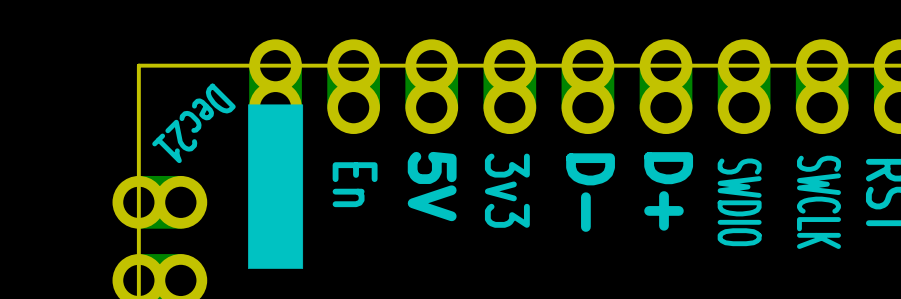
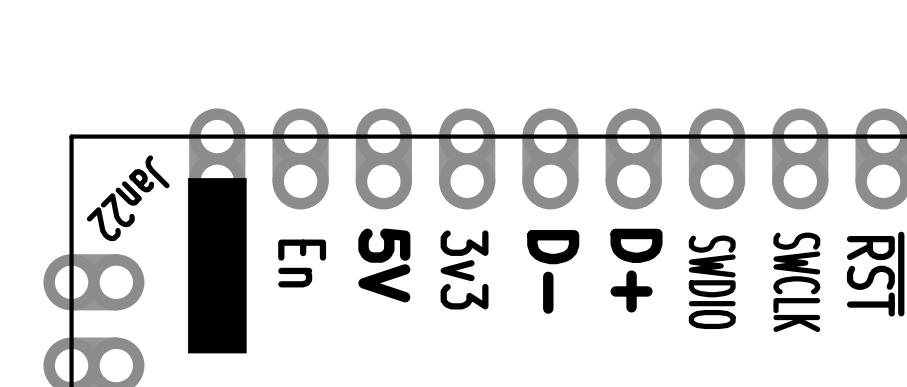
text: Dec21 (193, 123) -> Jan22 (128, 198)

